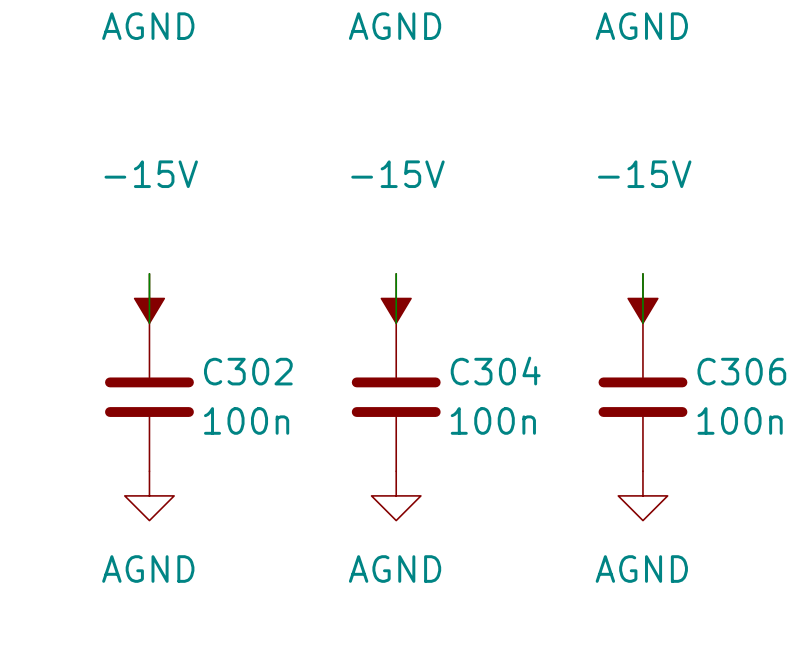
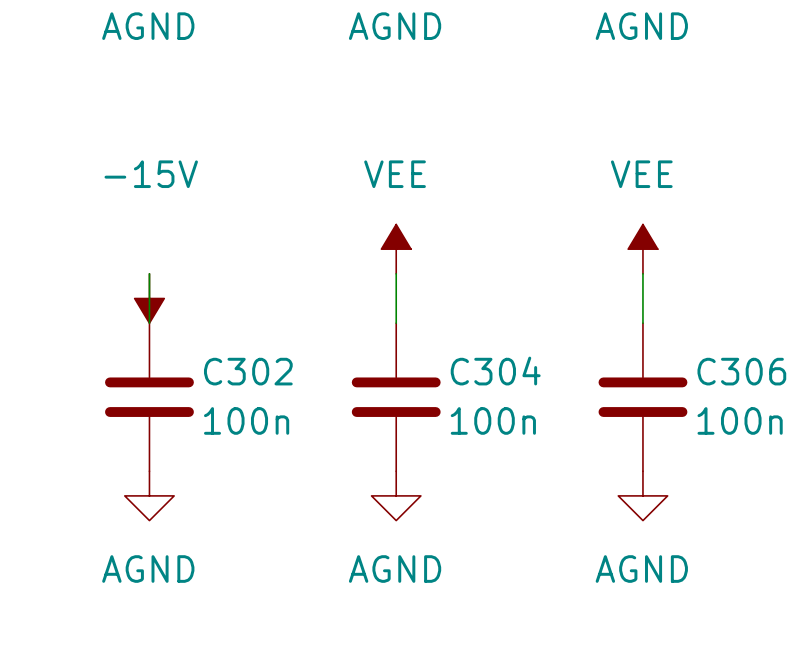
power symbol: none -> VEE (396, 249)
power symbol: none -> VEE (642, 249)
power symbol: -15V (396, 298) -> none
power symbol: -15V (642, 298) -> none

